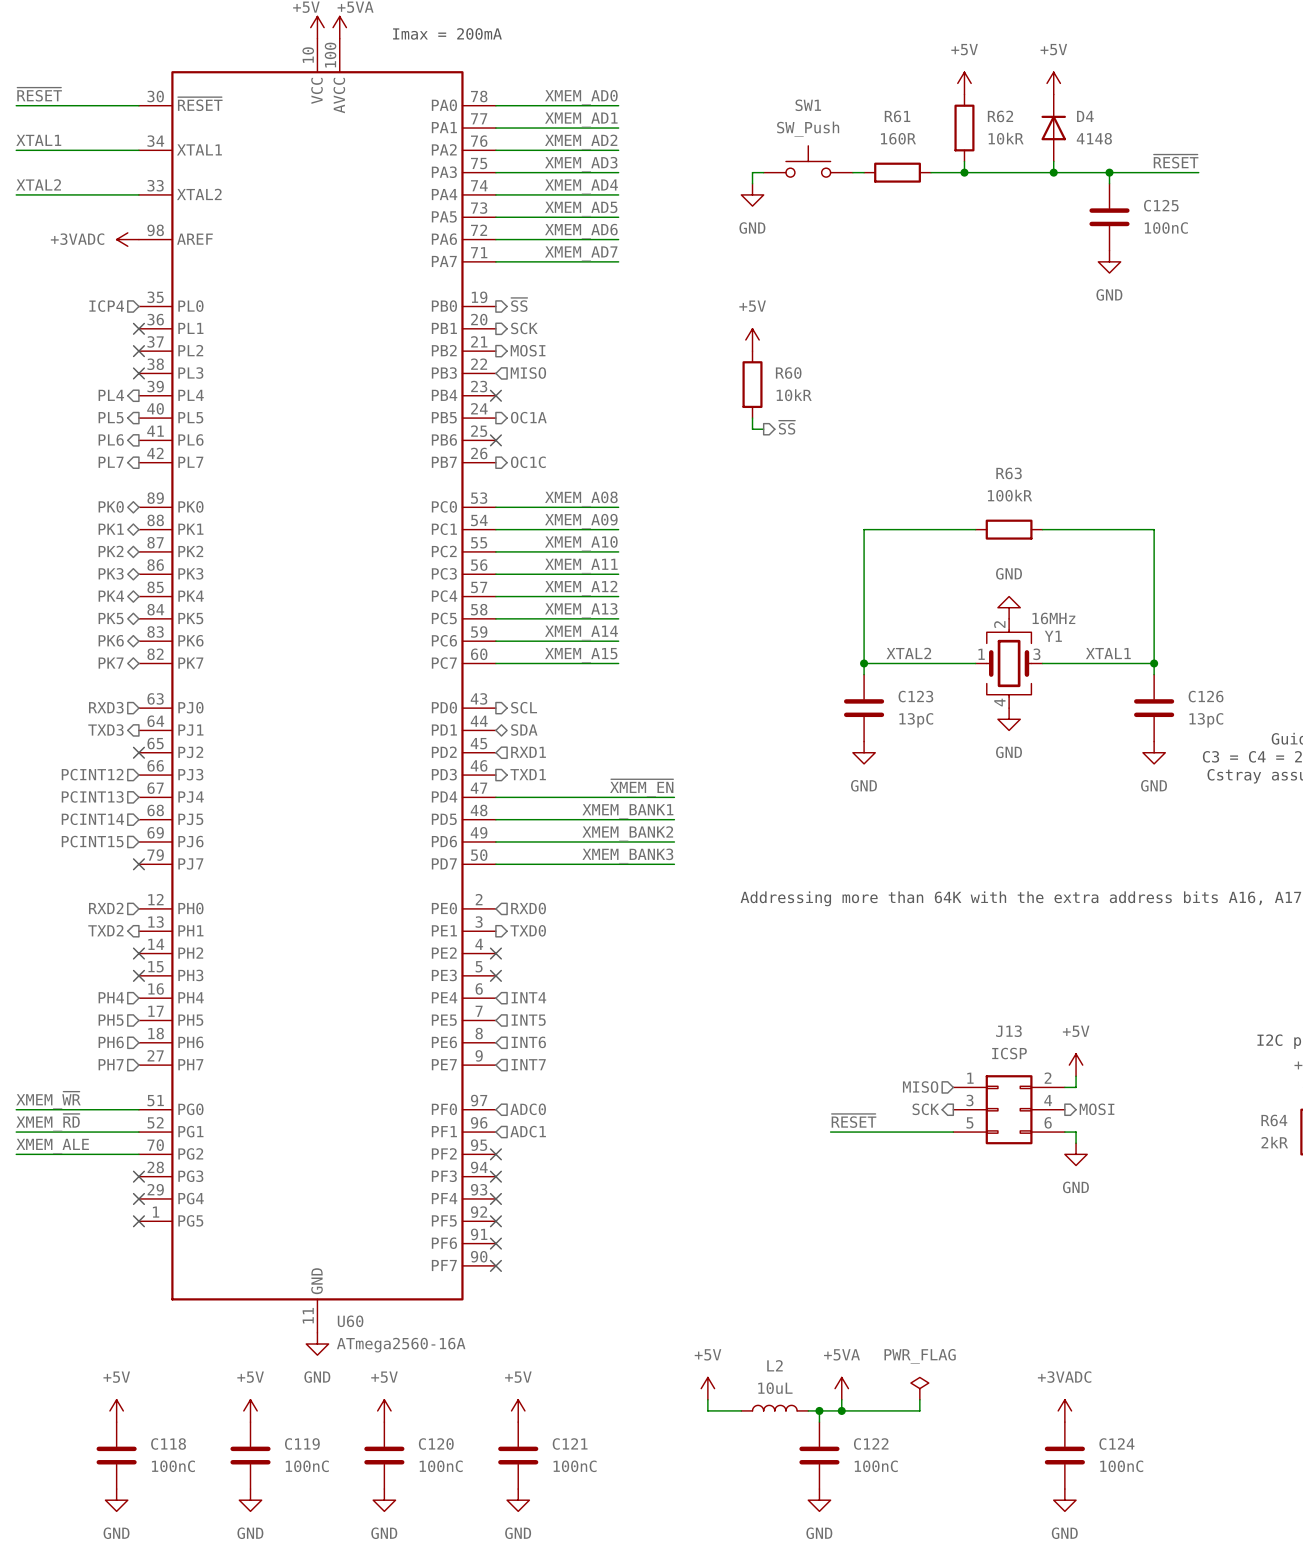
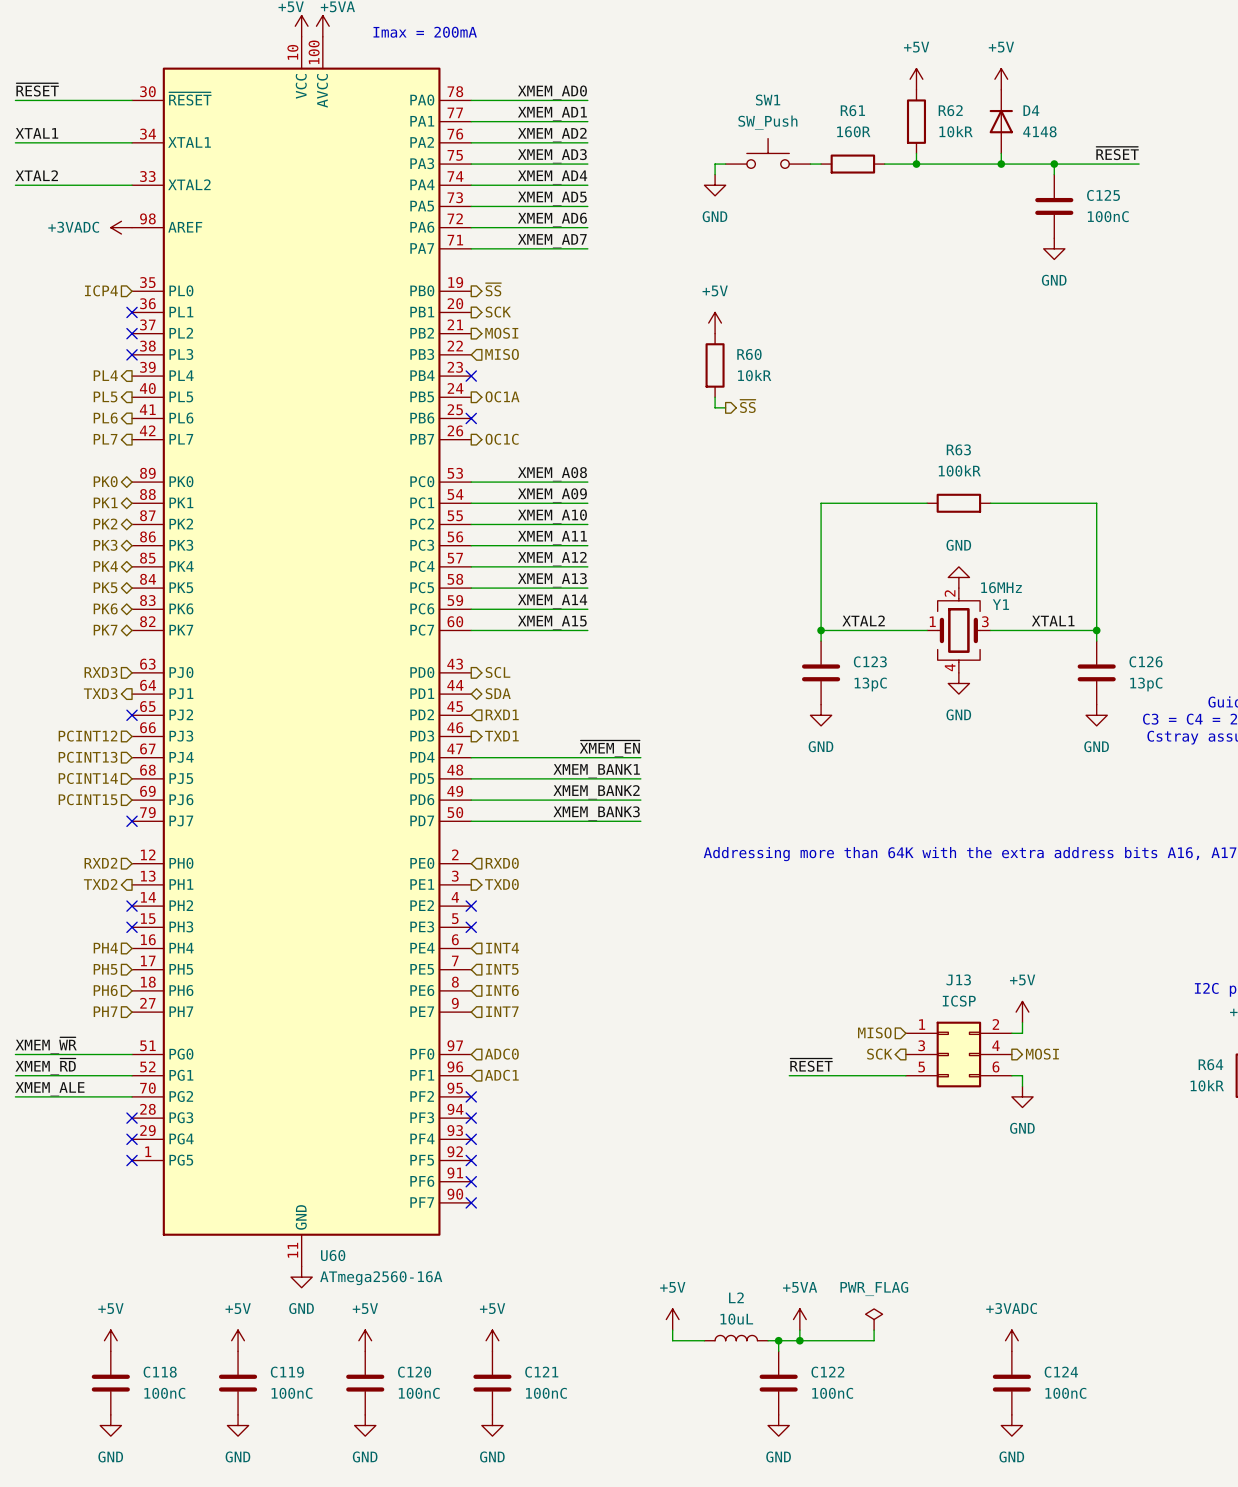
R64 value: 2kR (1274, 1142) -> 10kR (1207, 1085)

